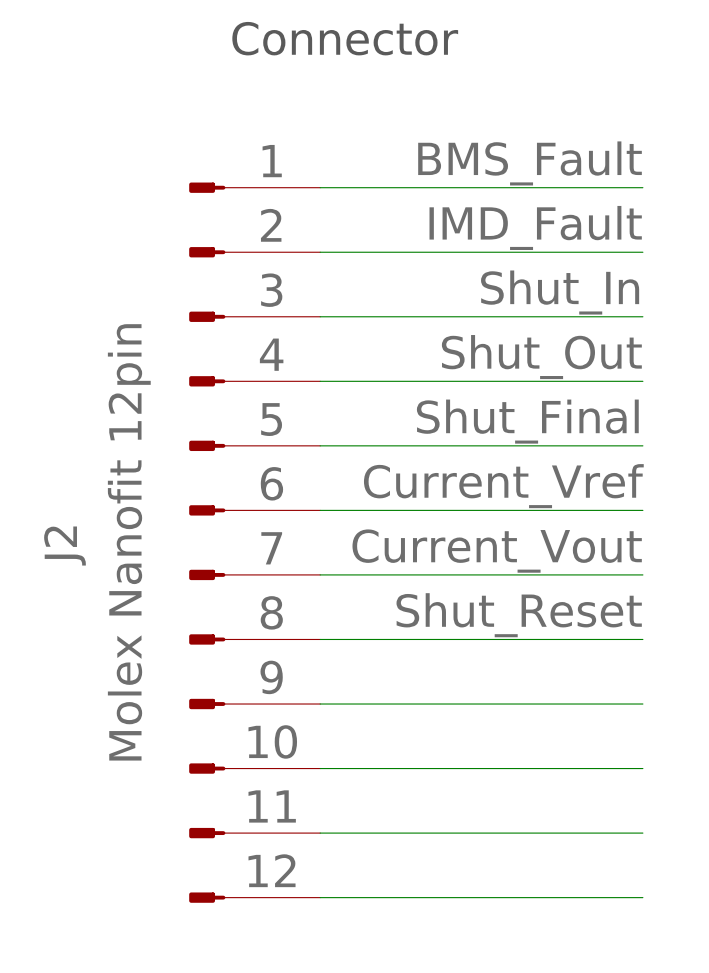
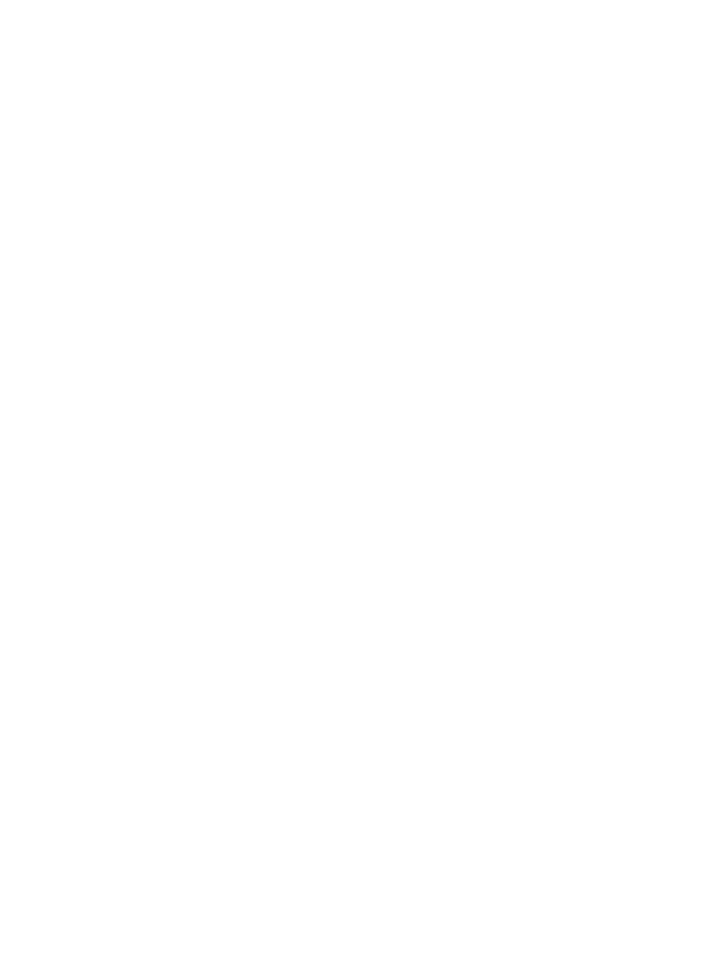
text: Connector (345, 38) -> none
label: BMS_Fault (530, 163) -> none
wire: (320, 187) (642, 187) -> none
label: IMD_Fault (535, 227) -> none
wire: (320, 252) (642, 252) -> none
label: Shut_In (560, 292) -> none
wire: (320, 316) (642, 316) -> none
label: Shut_Out (541, 357) -> none
wire: (320, 381) (642, 381) -> none
label: Shut_Final (527, 421) -> none
wire: (320, 445) (642, 445) -> none
label: Current_Vref (503, 486) -> none
wire: (320, 510) (642, 510) -> none
J2: Molex Nanofit 12pin (254, 542) -> none
label: Current_Vout (497, 551) -> none
wire: (320, 574) (642, 574) -> none
label: Shut_Reset (519, 615) -> none
wire: (320, 639) (642, 639) -> none
wire: (320, 704) (642, 704) -> none
wire: (320, 768) (642, 768) -> none
wire: (320, 833) (642, 833) -> none
wire: (320, 897) (642, 897) -> none

